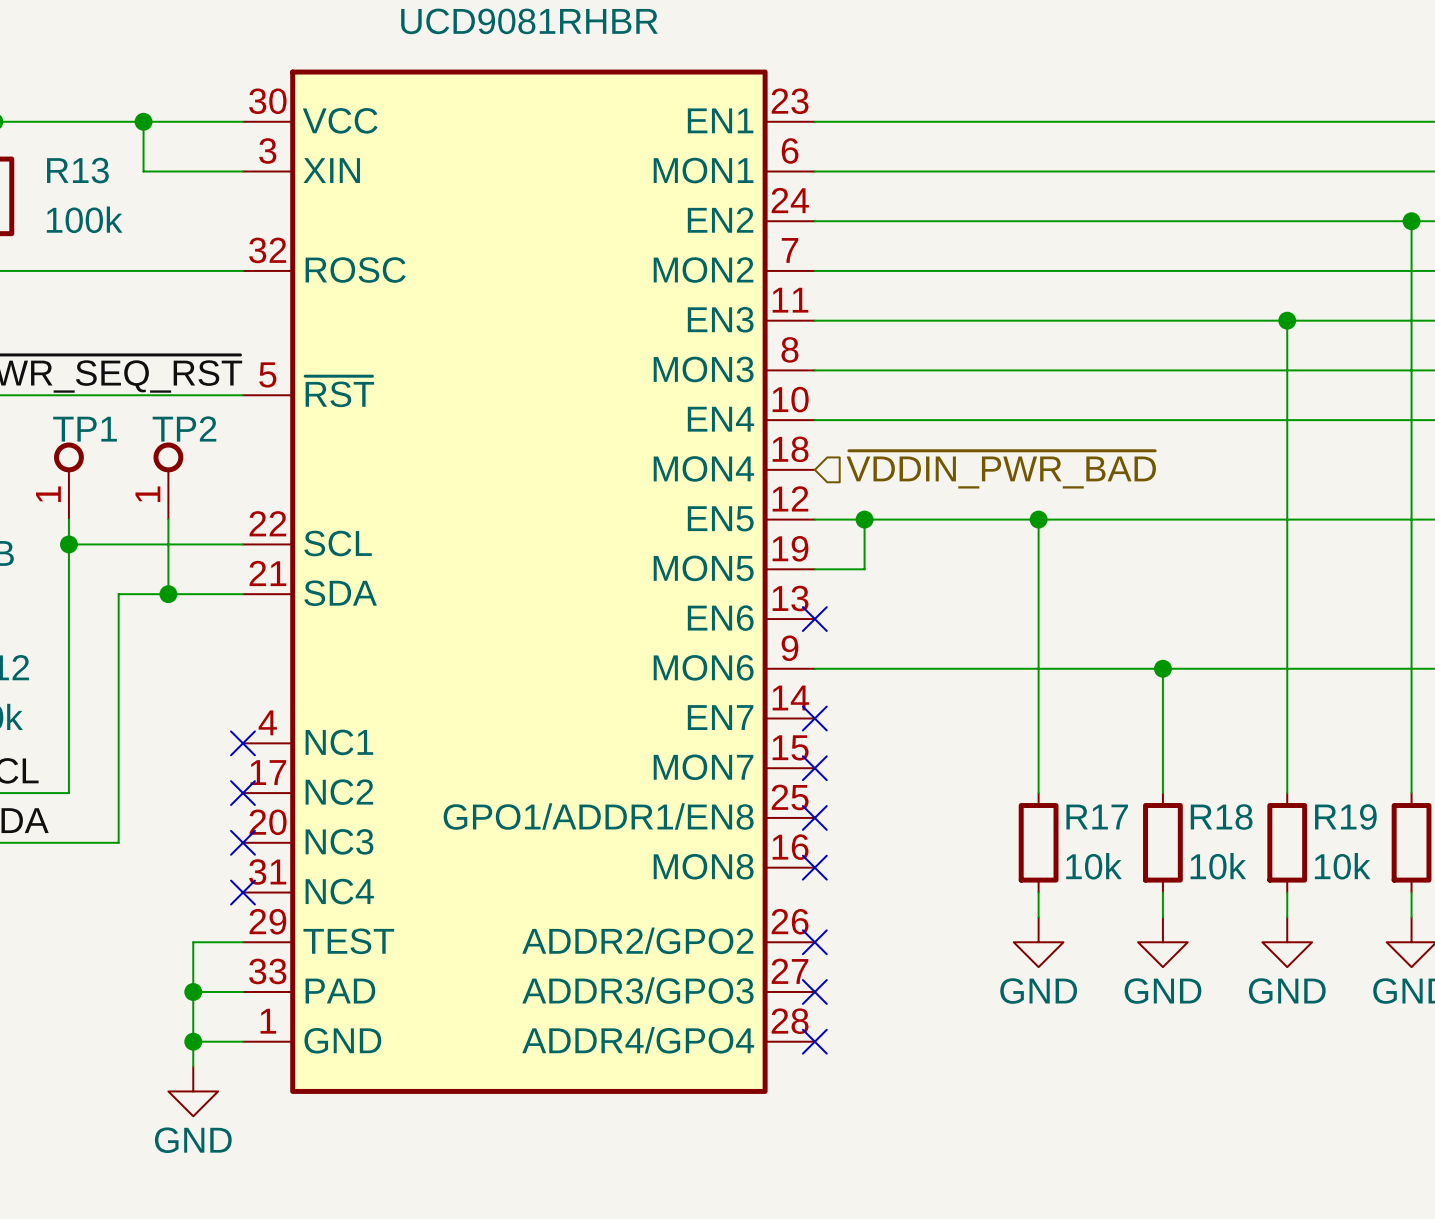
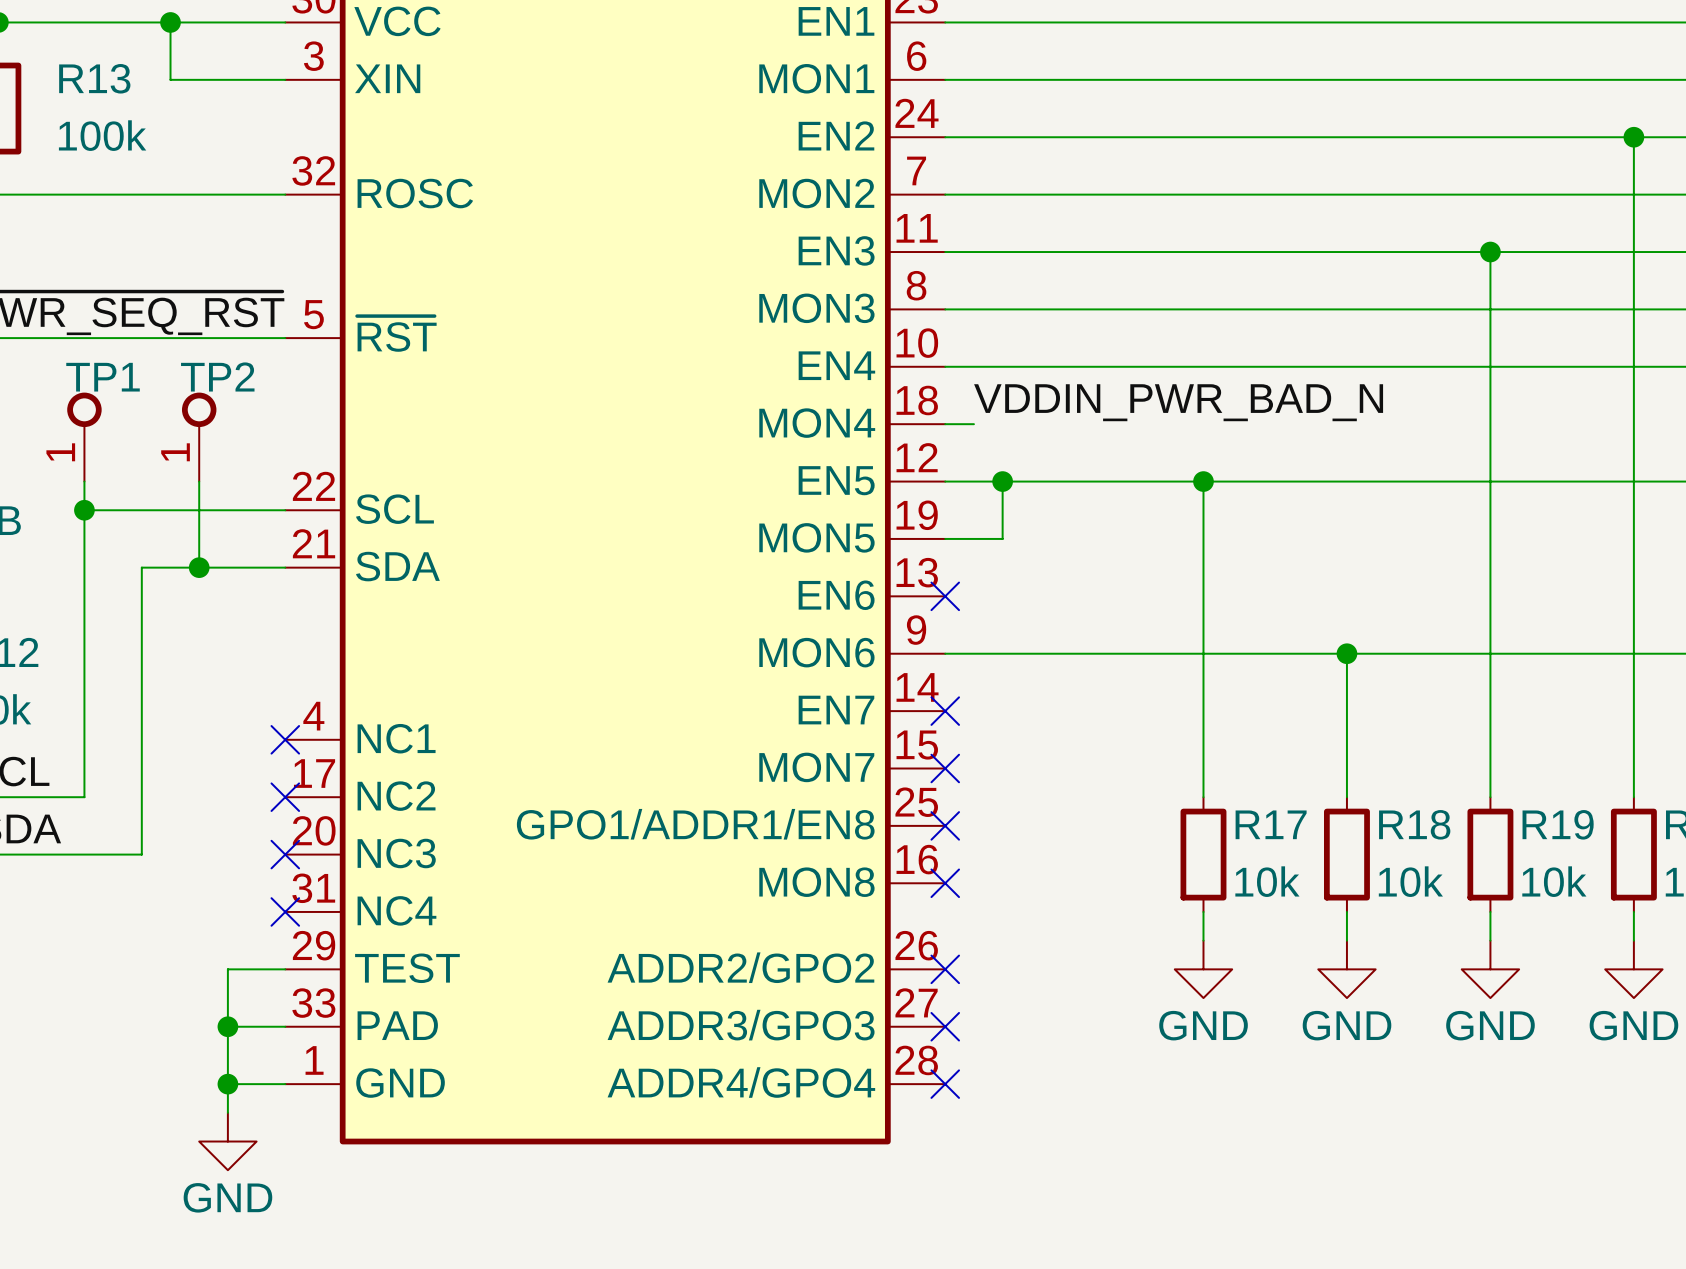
label: none -> VDDIN_PWR_BAD_N (1178, 402)
wire: none -> (945, 424) (973, 424)
hierarchical label: ~{VDDIN_PWR_BAD} (1001, 469) -> none

